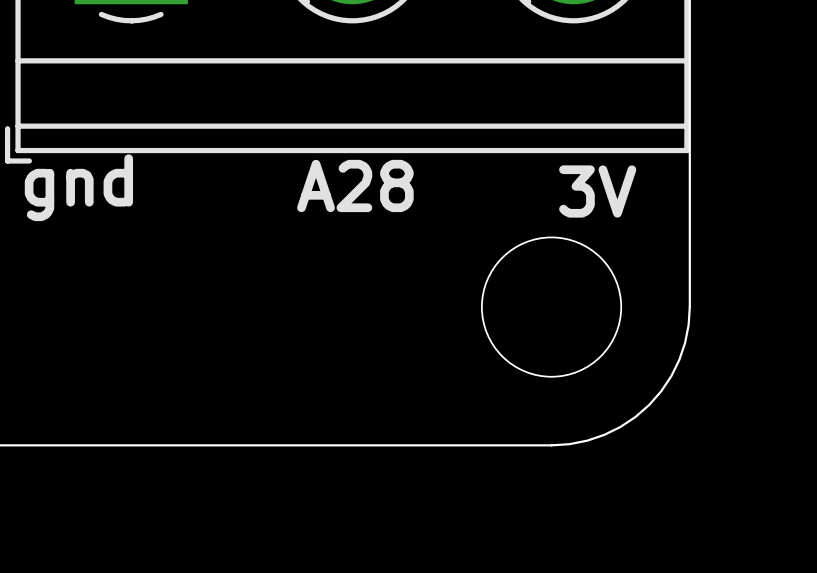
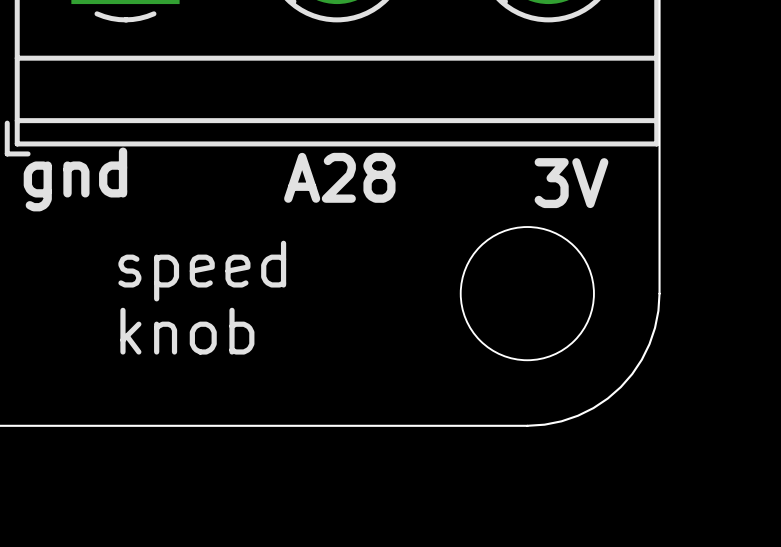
text: none -> speed (202, 271)
text: none -> knob (187, 331)

